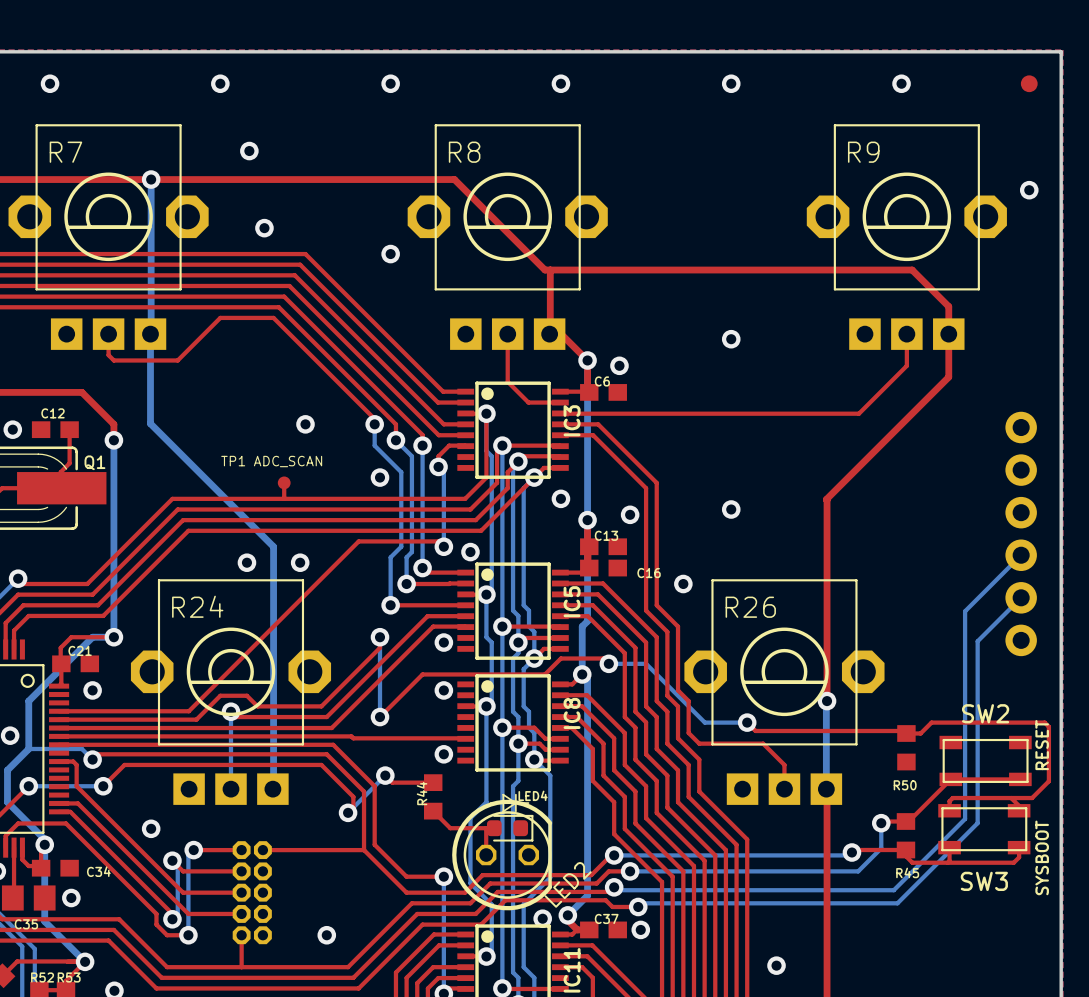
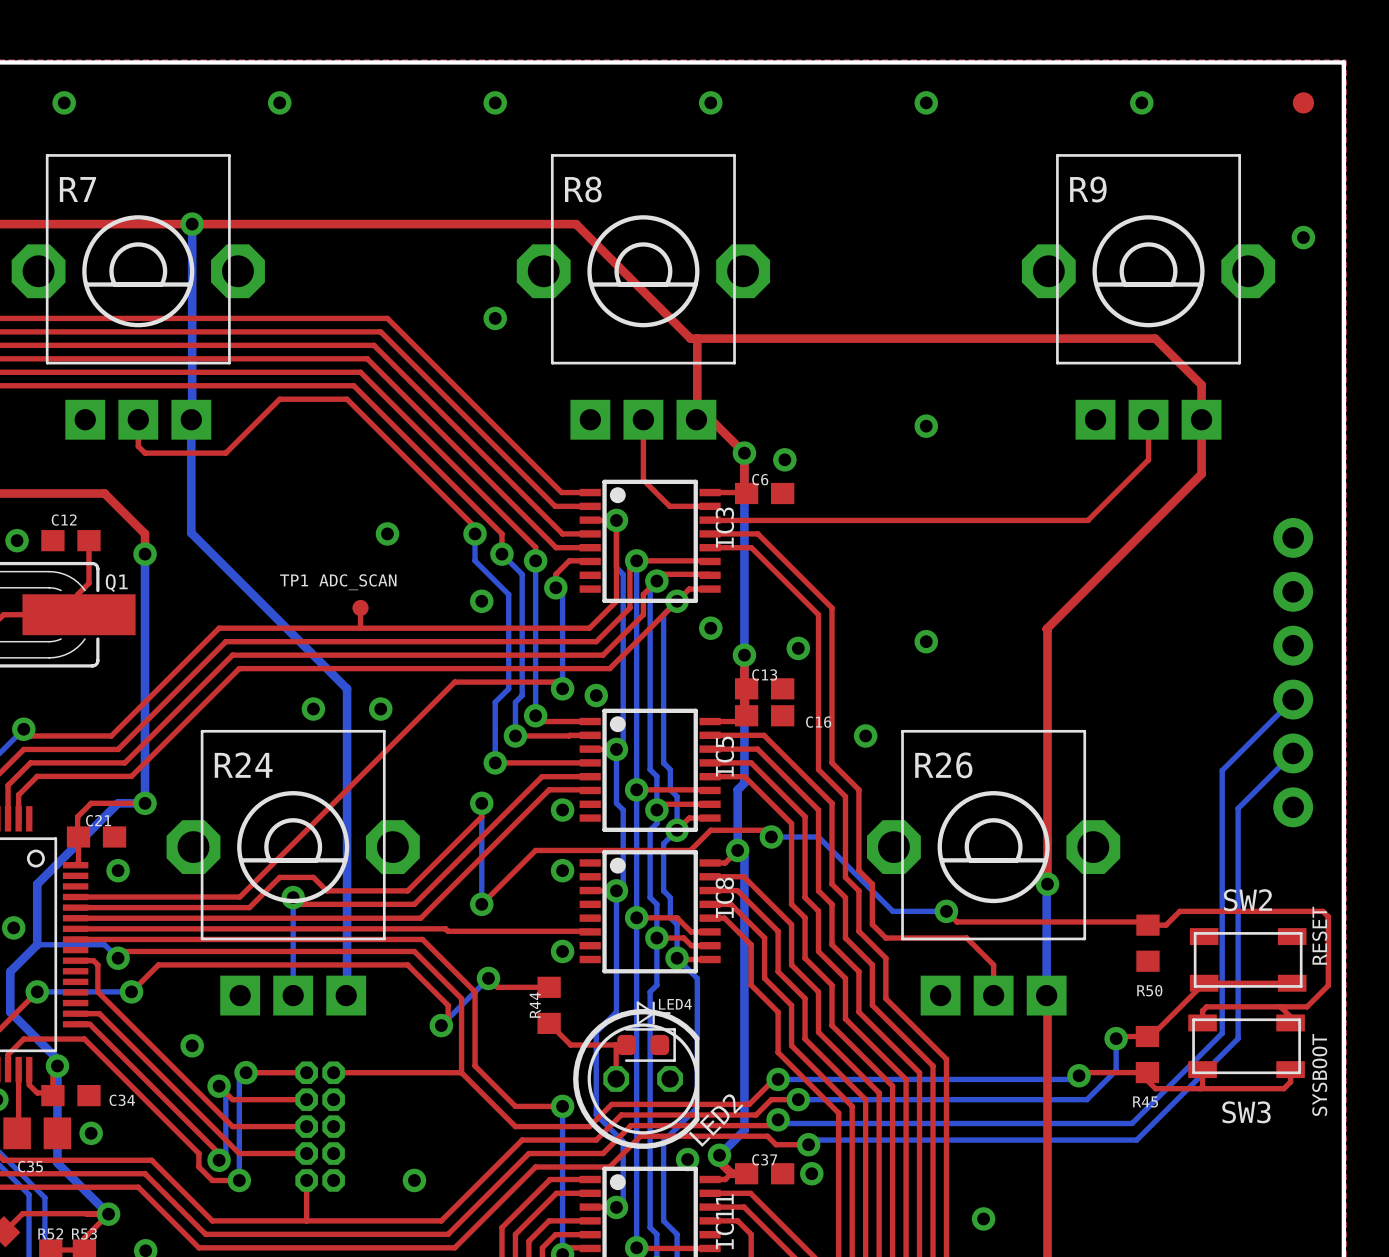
via: (249, 151) -> none
via: (264, 228) -> none

